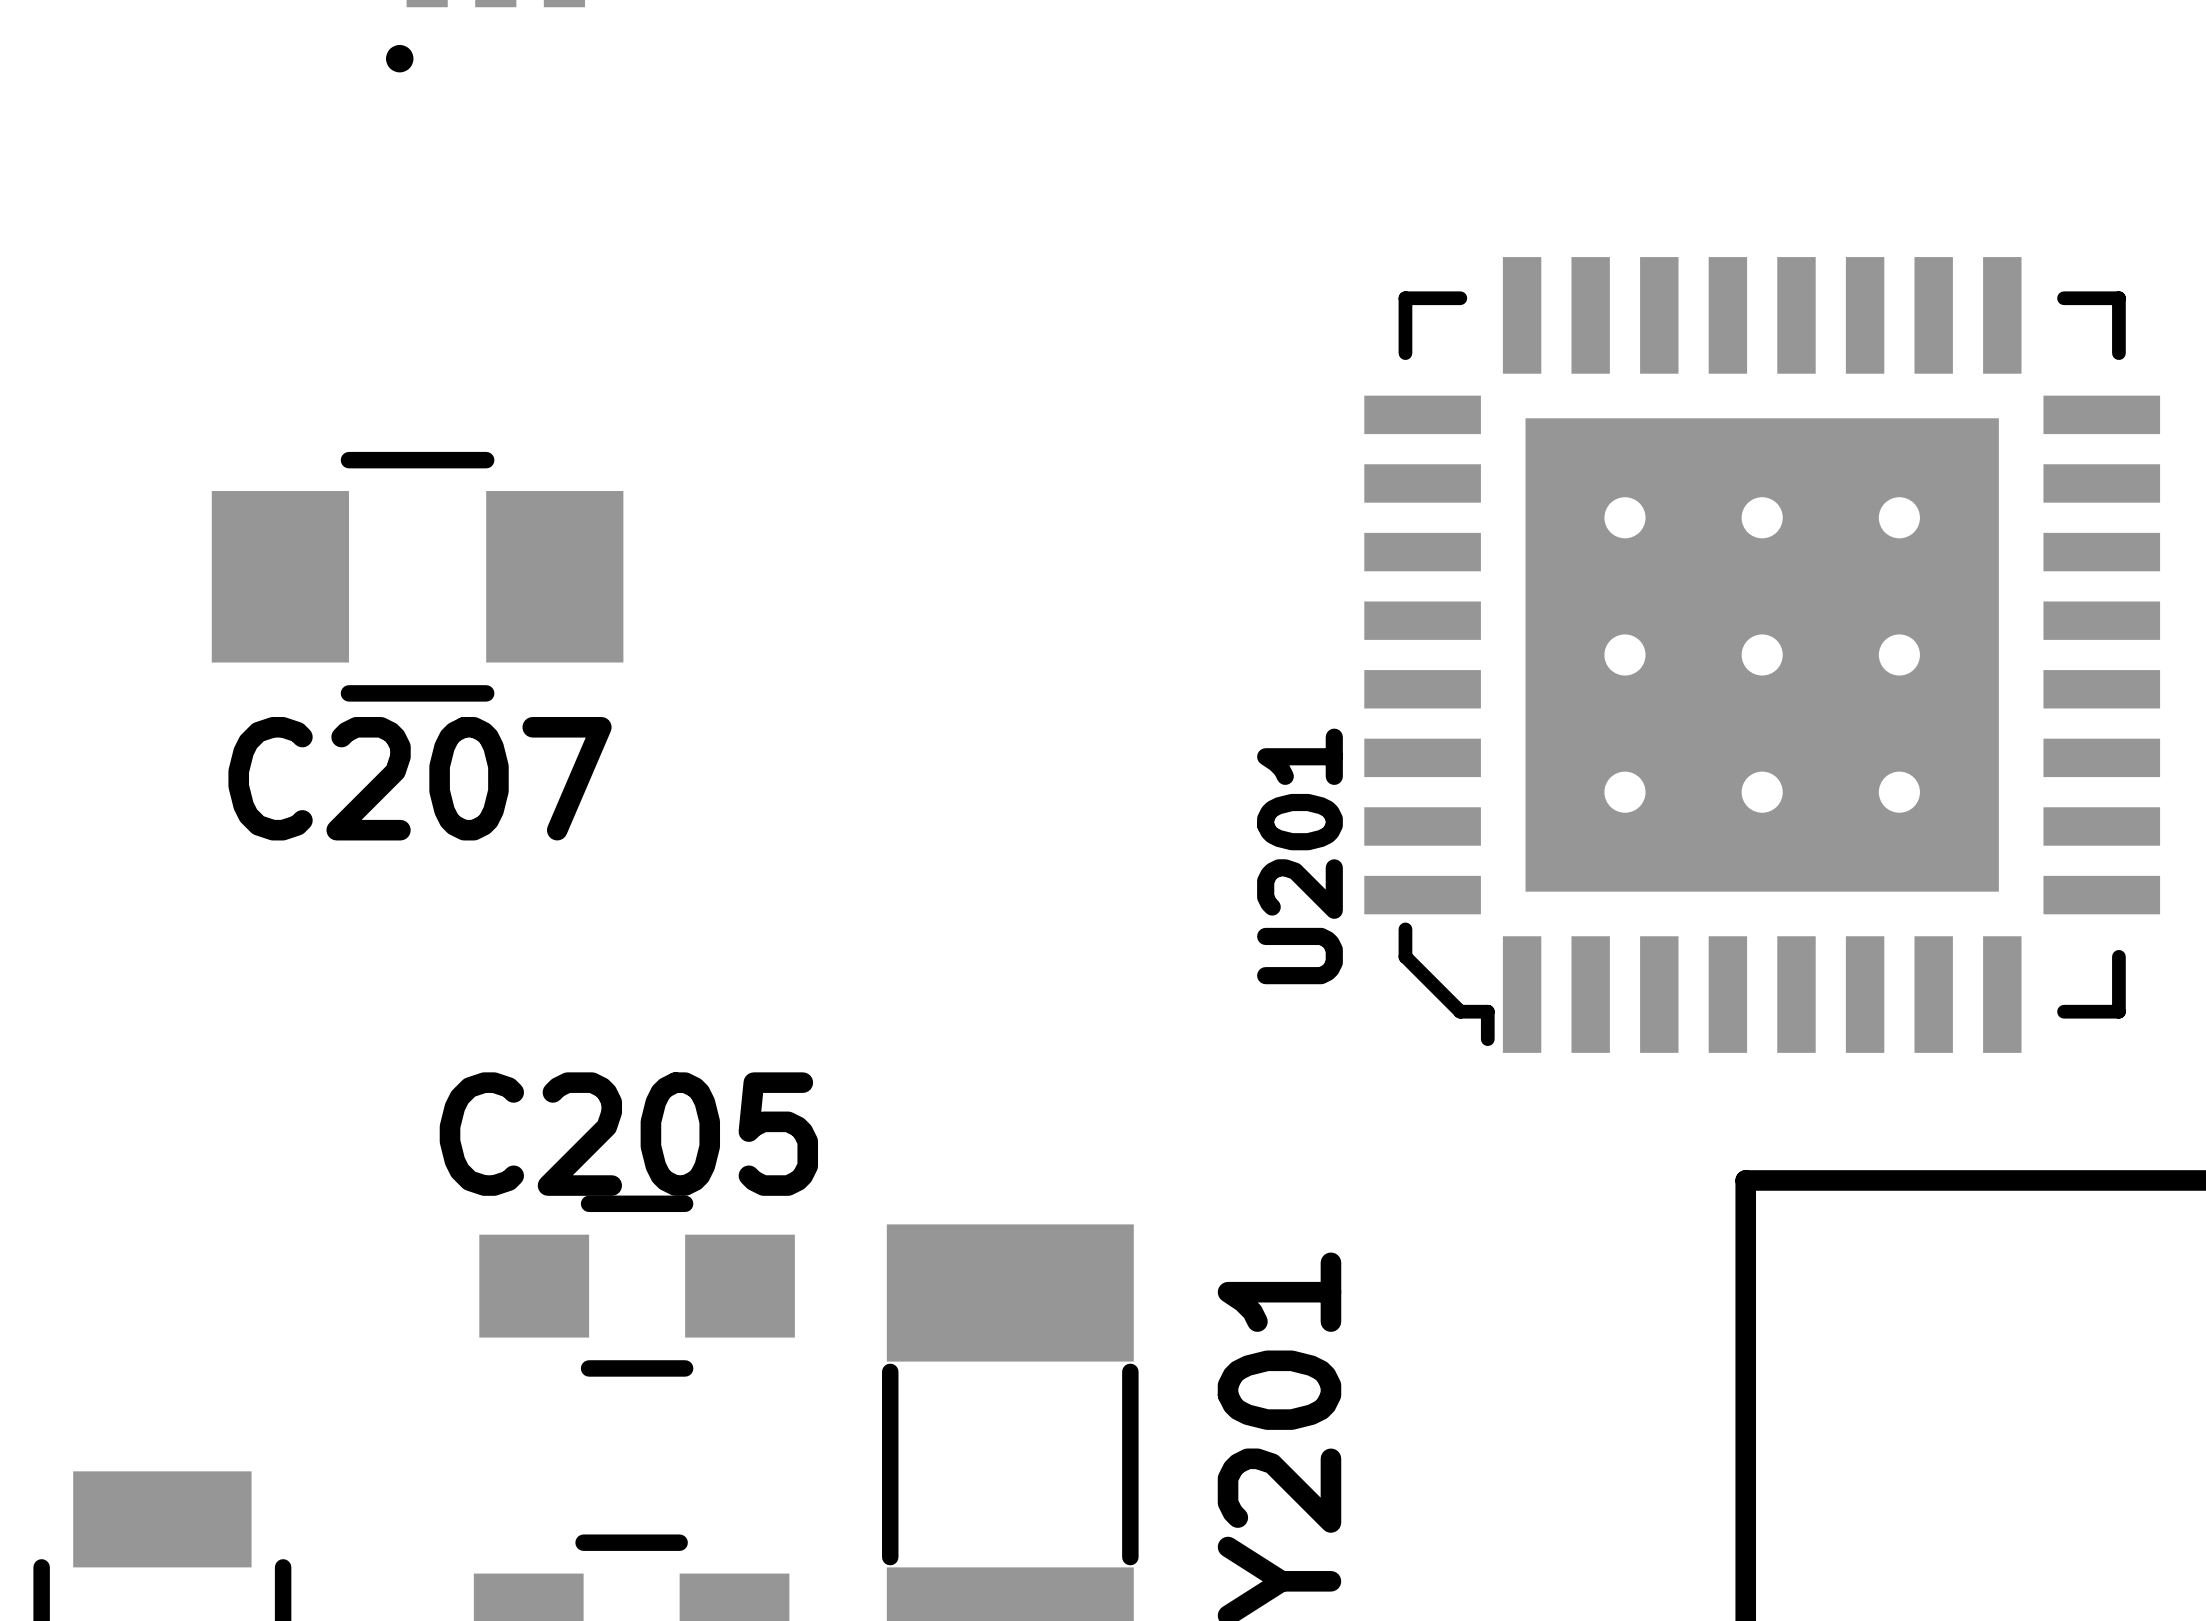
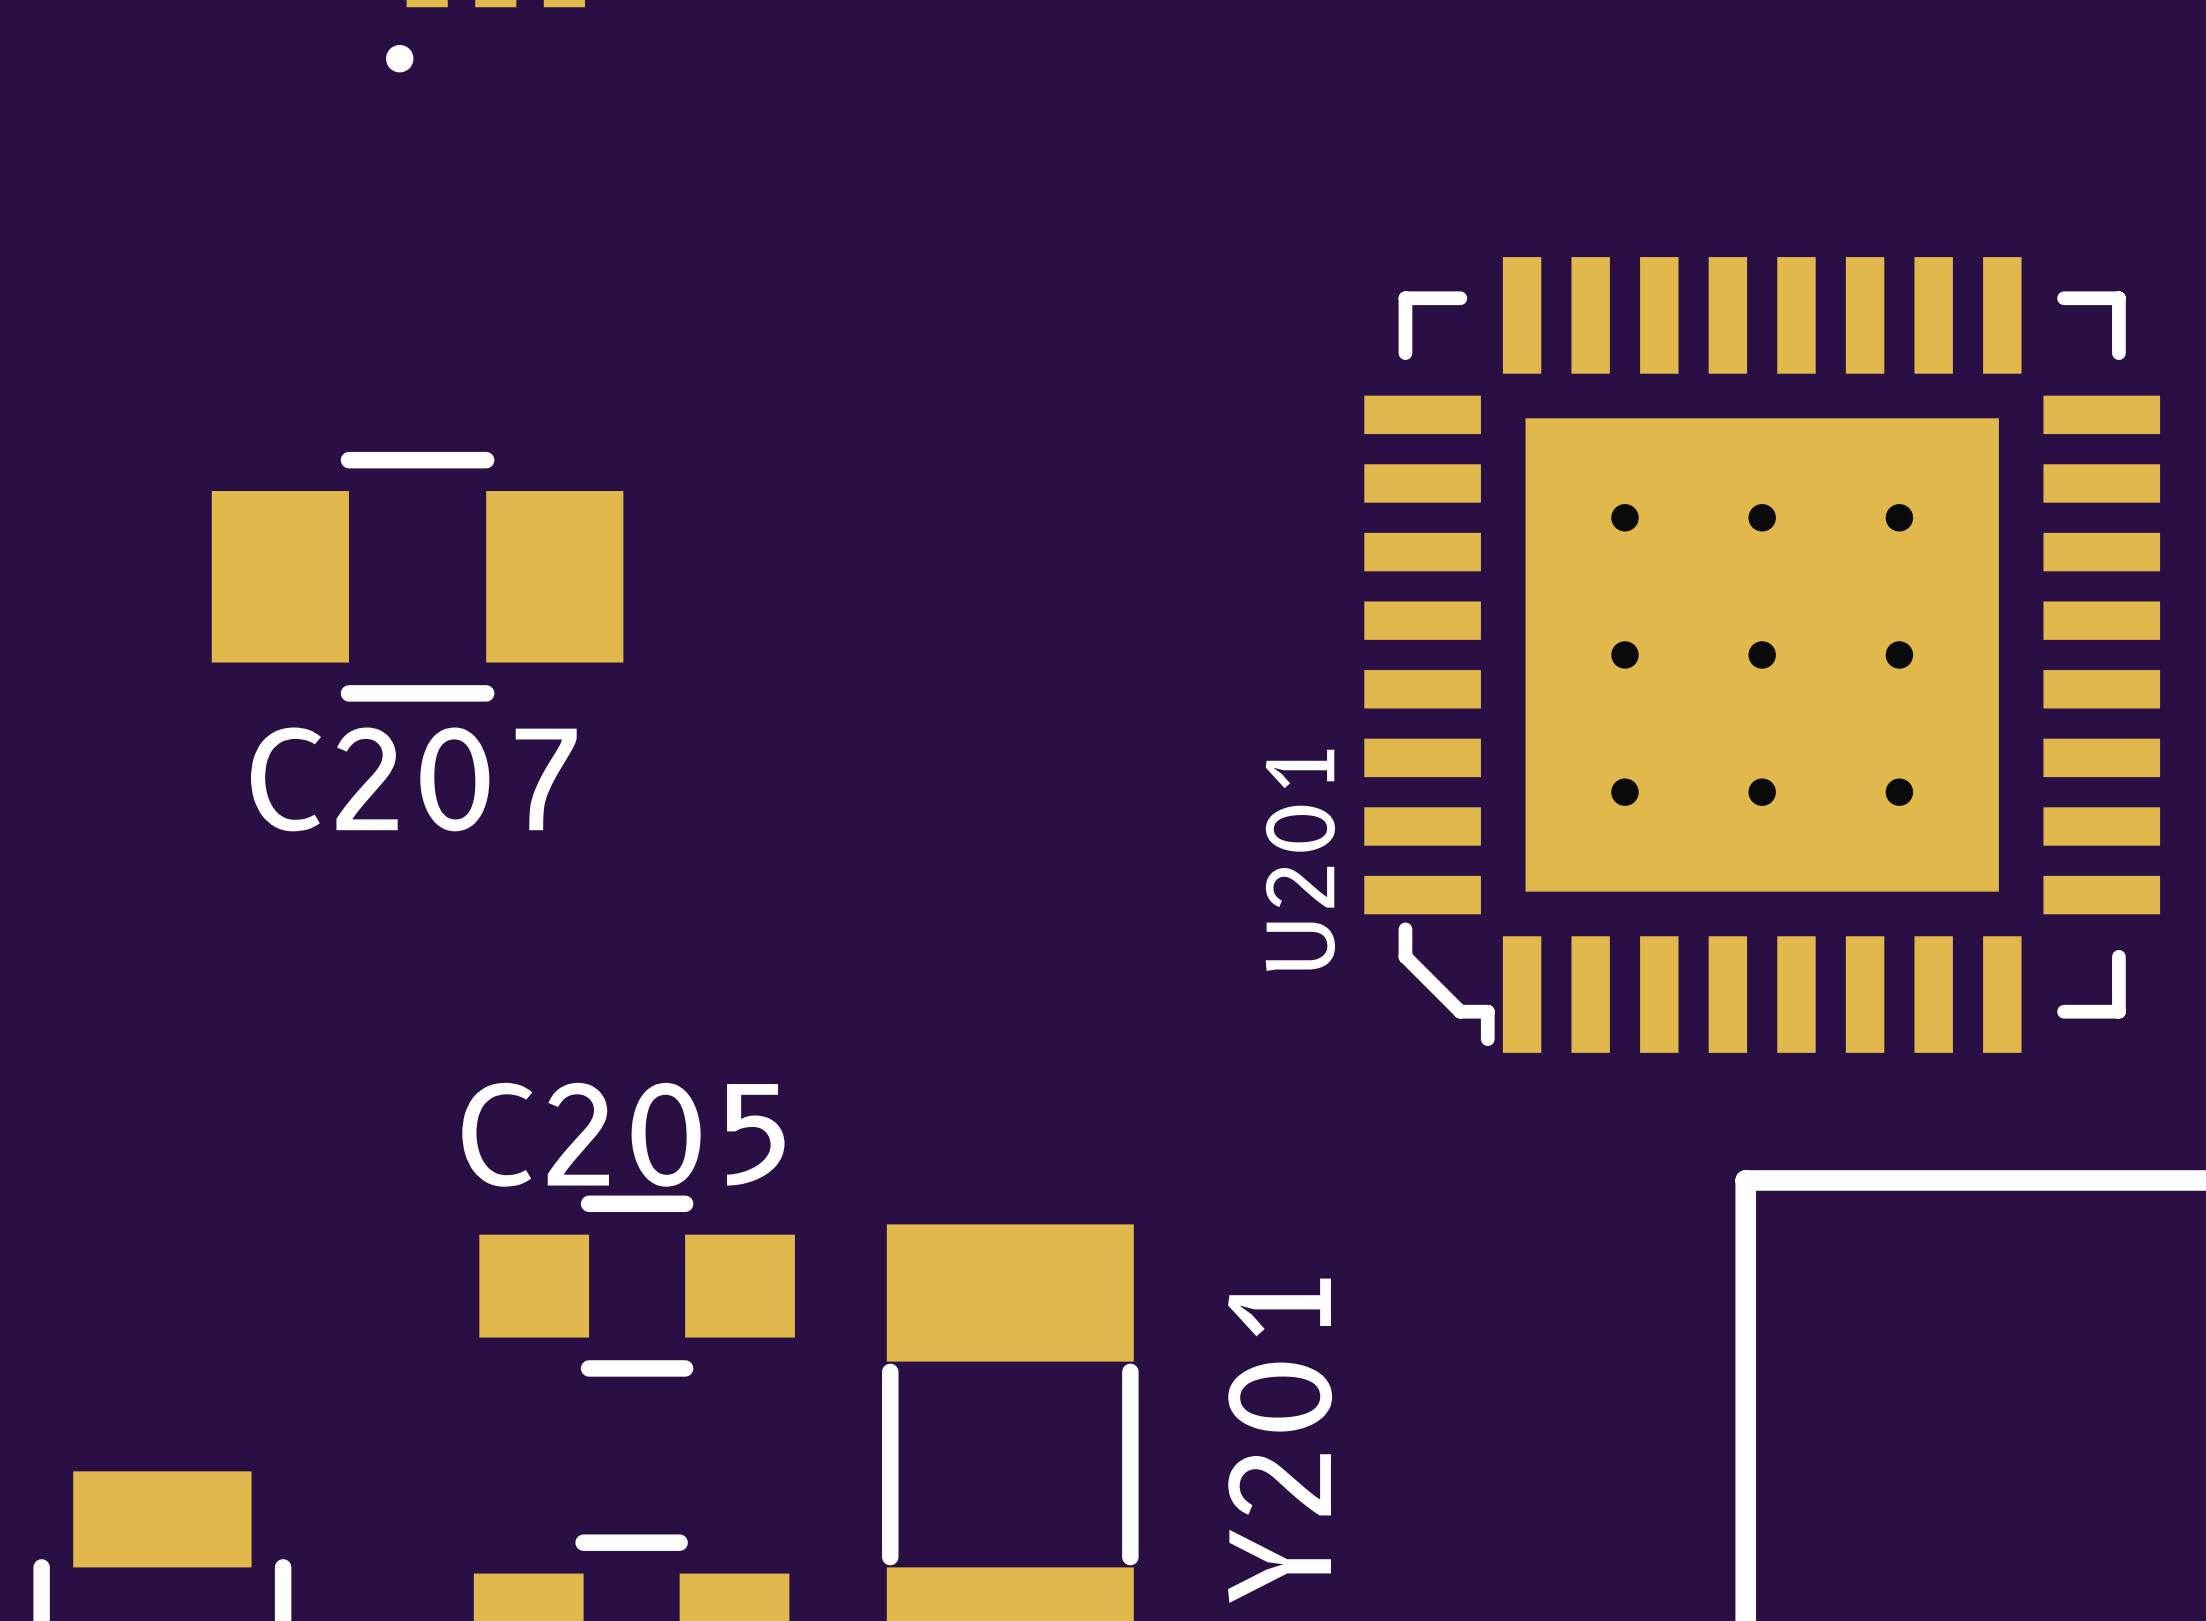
U201 footprint: [1364, 257, 2161, 1053] -> [1364, 257, 2161, 1053]

